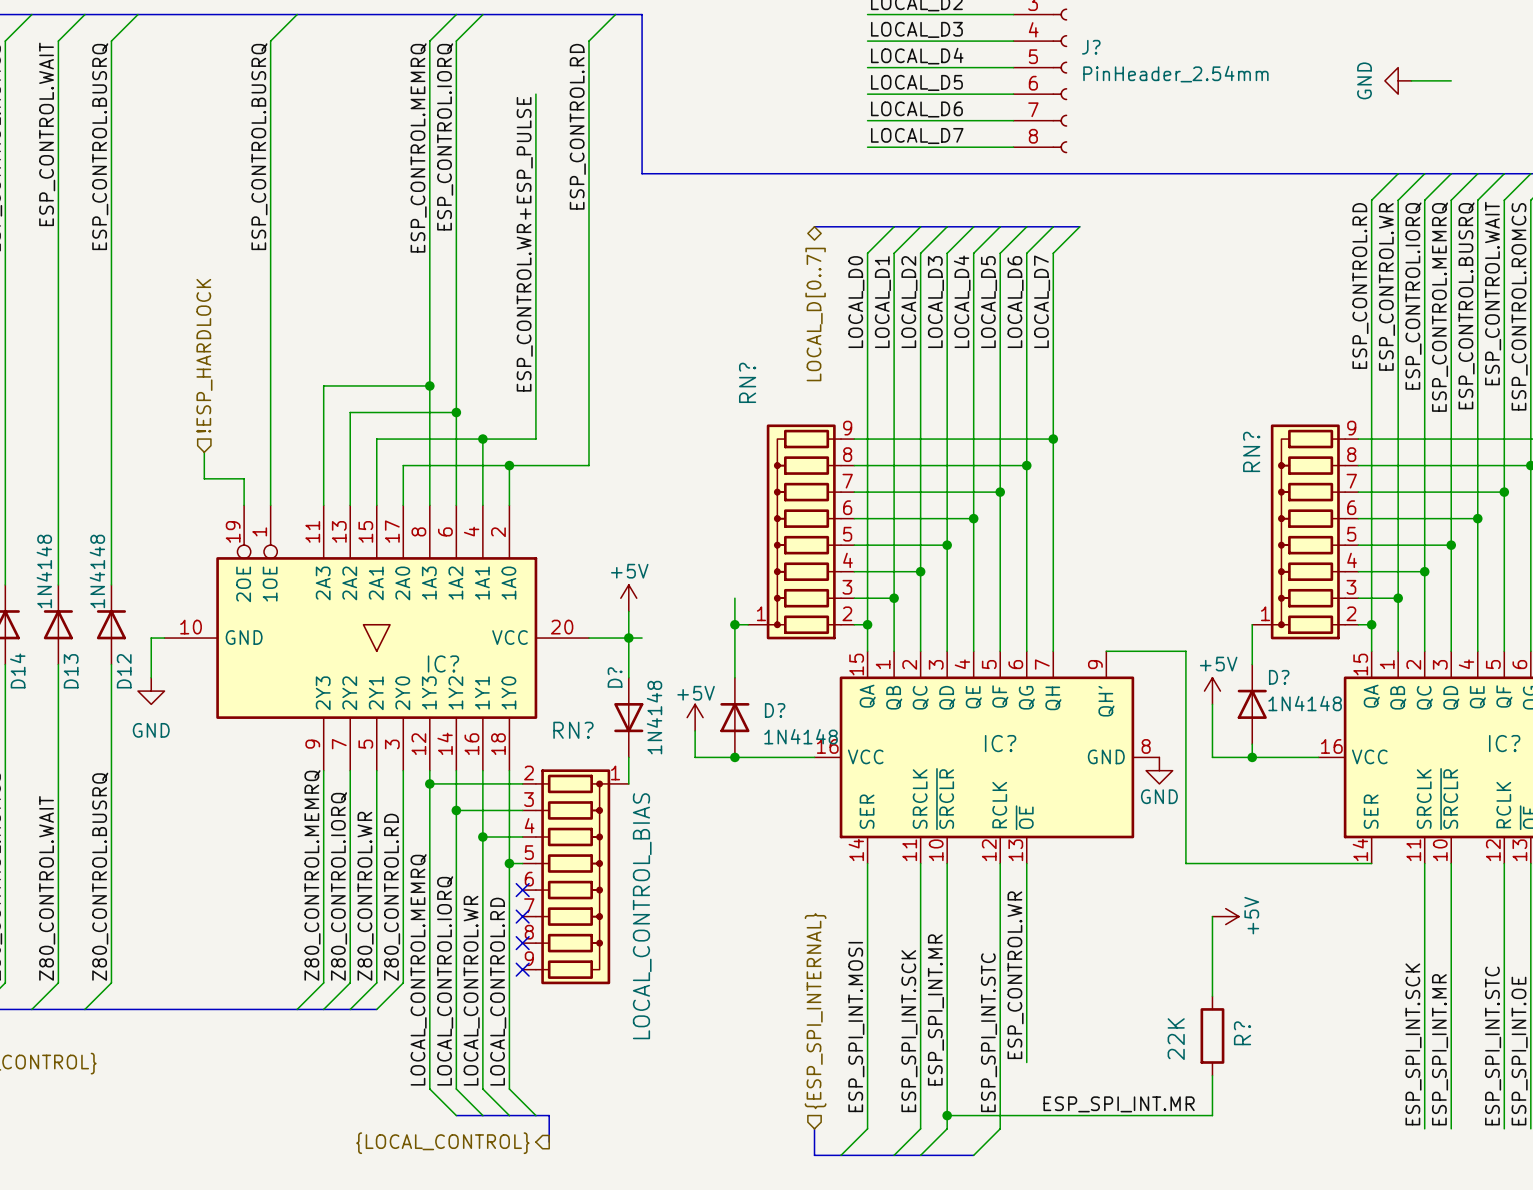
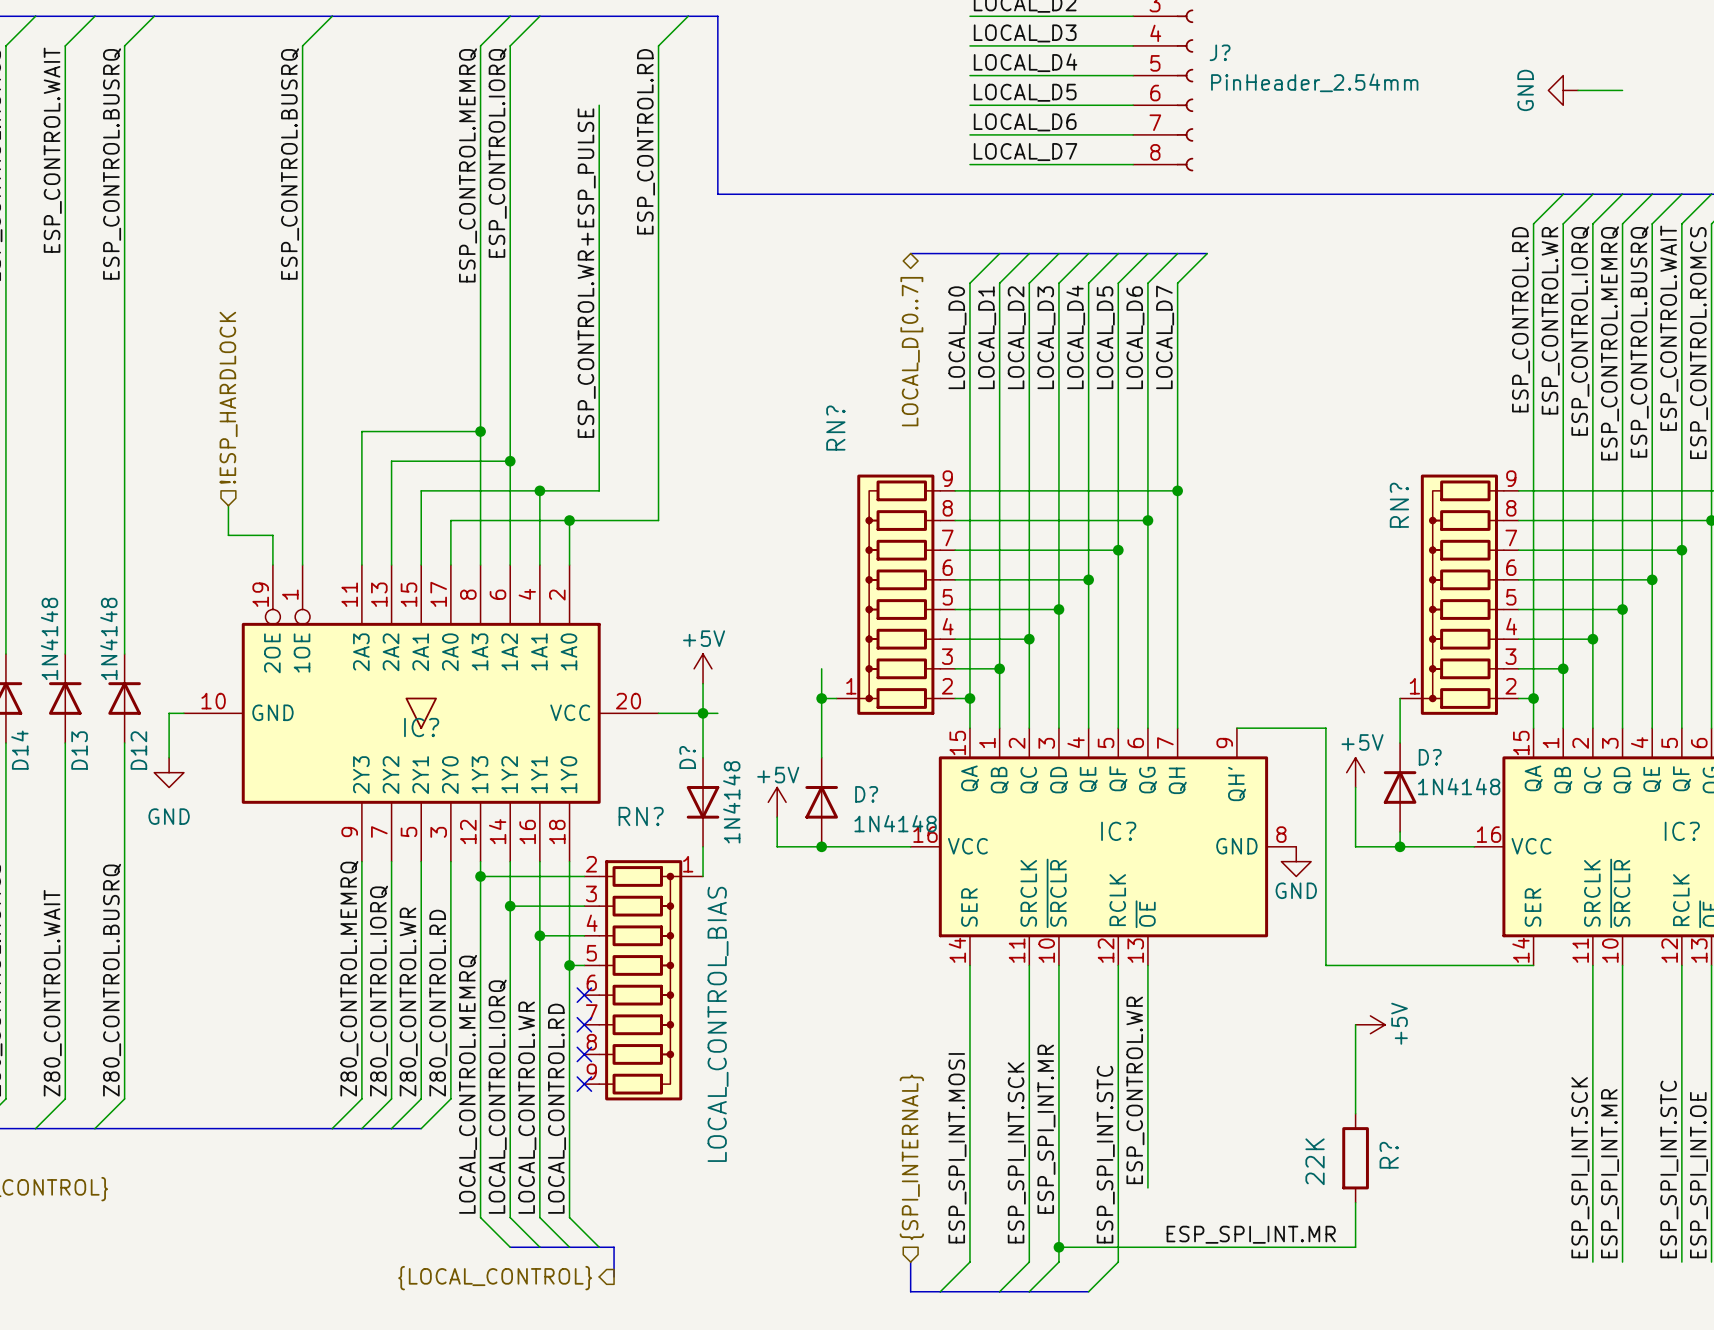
IC? name position: IC? (443, 663) -> IC? (421, 727)
hierarchical label: {ESP_SPI_INTERNAL} (815, 1011) -> {SPI_INTERNAL} (911, 1157)

